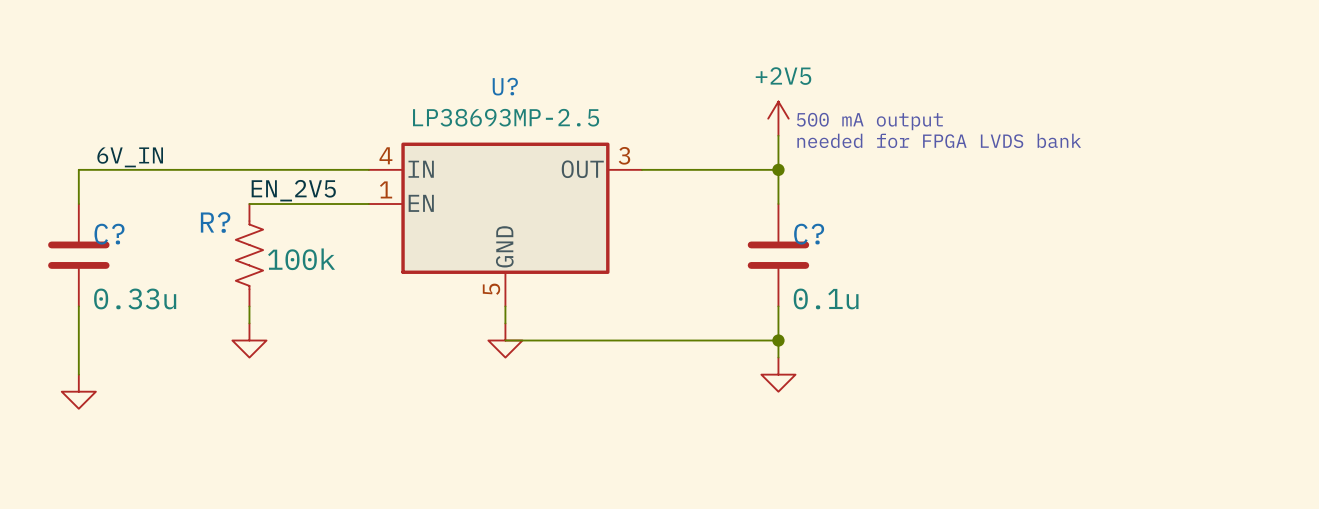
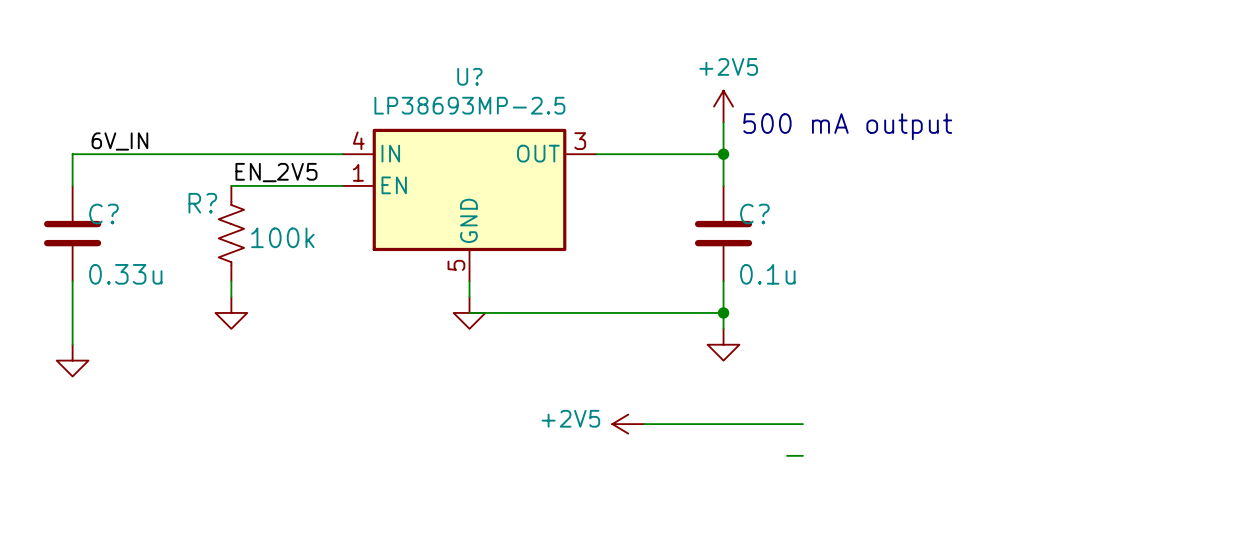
text: 500 mA output (869, 121) -> none
text: needed for FPGA LVDS bank (939, 140) -> 500 mA output (847, 126)
power symbol: none -> +2V5 (628, 424)
wire: none -> (644, 424) (802, 424)
wire: none -> (787, 455) (802, 455)

